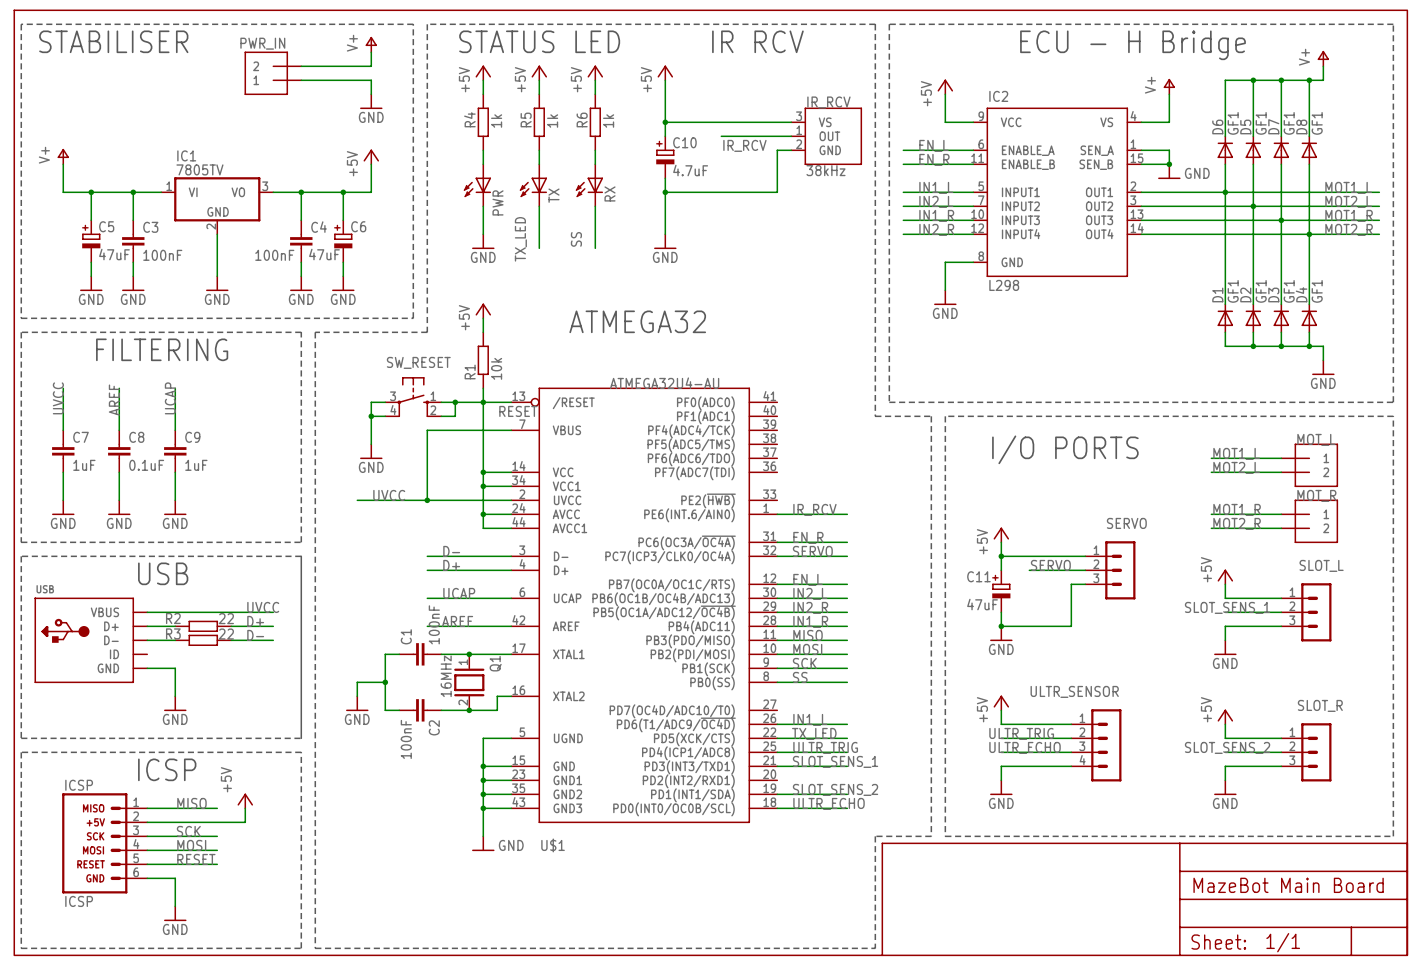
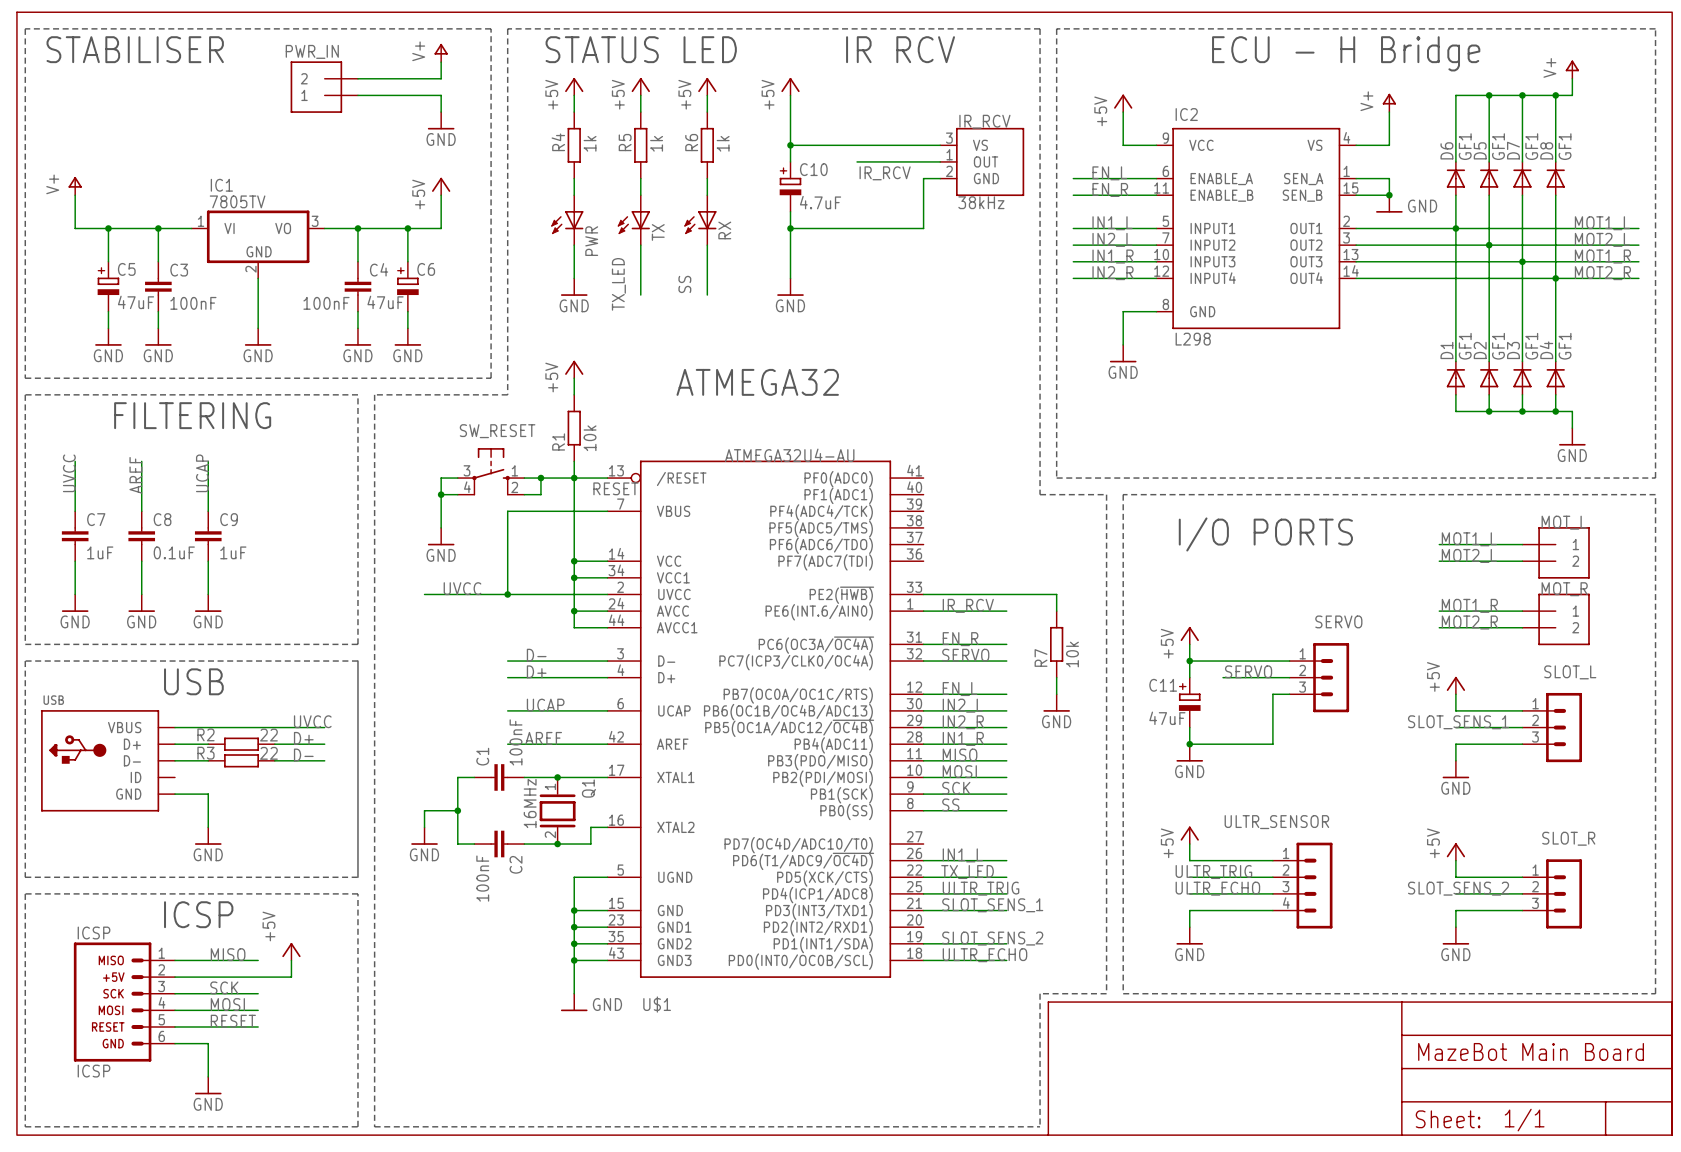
wire: none -> (923, 594) (1056, 594) (1056, 611)
R7: none -> 10k (1056, 644)
wire: none -> (1056, 677) (1056, 694)
power symbol: none -> GND (1056, 703)

